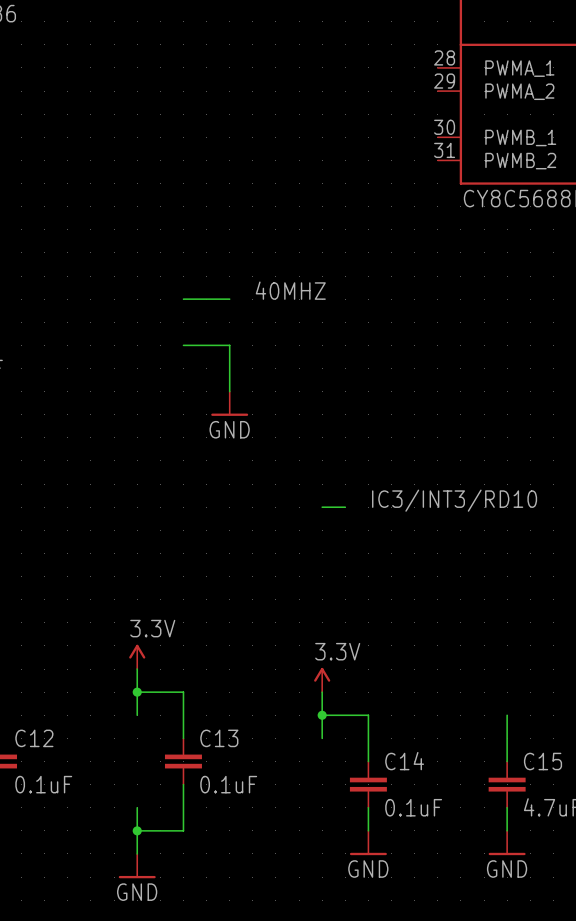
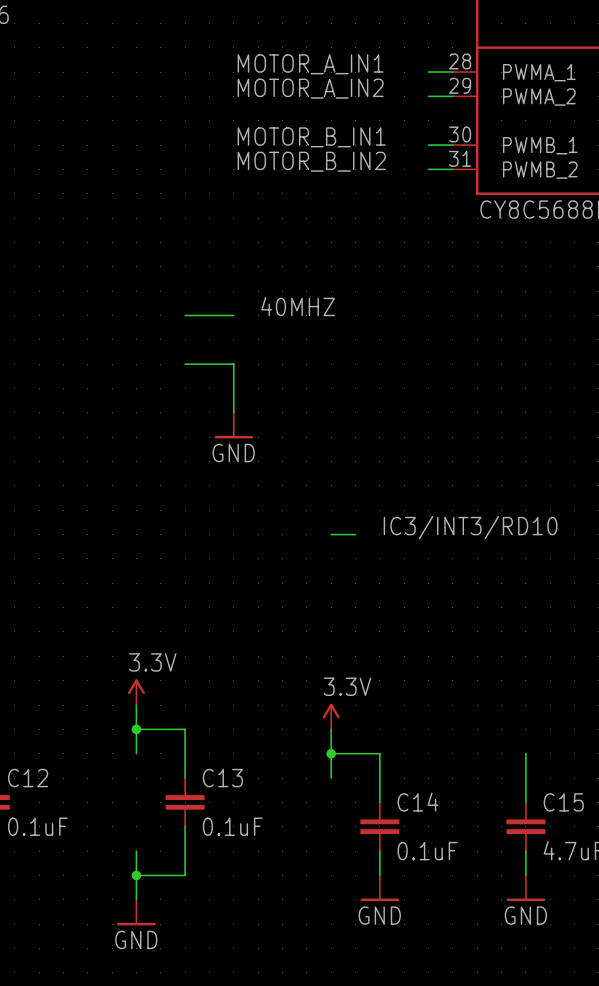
label: none -> MOTOR_A_IN1 (310, 64)
wire: none -> (428, 72) (452, 72)
label: none -> MOTOR_A_IN2 (310, 88)
wire: none -> (428, 96) (452, 96)
label: none -> MOTOR_B_IN1 (311, 137)
wire: none -> (428, 145) (452, 145)
label: none -> MOTOR_B_IN2 (311, 161)
wire: none -> (428, 169) (452, 169)

